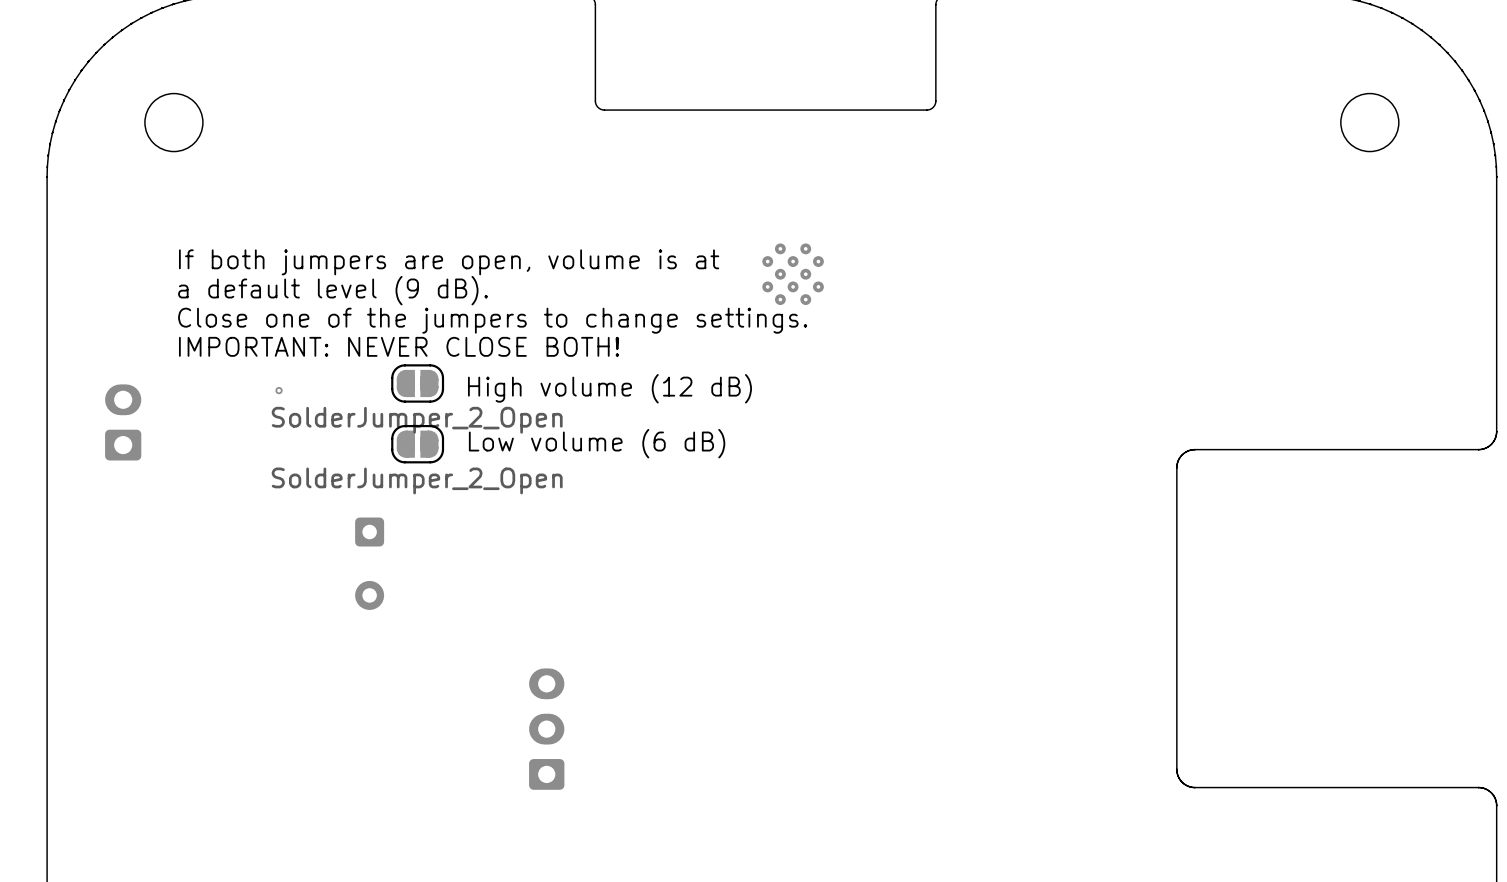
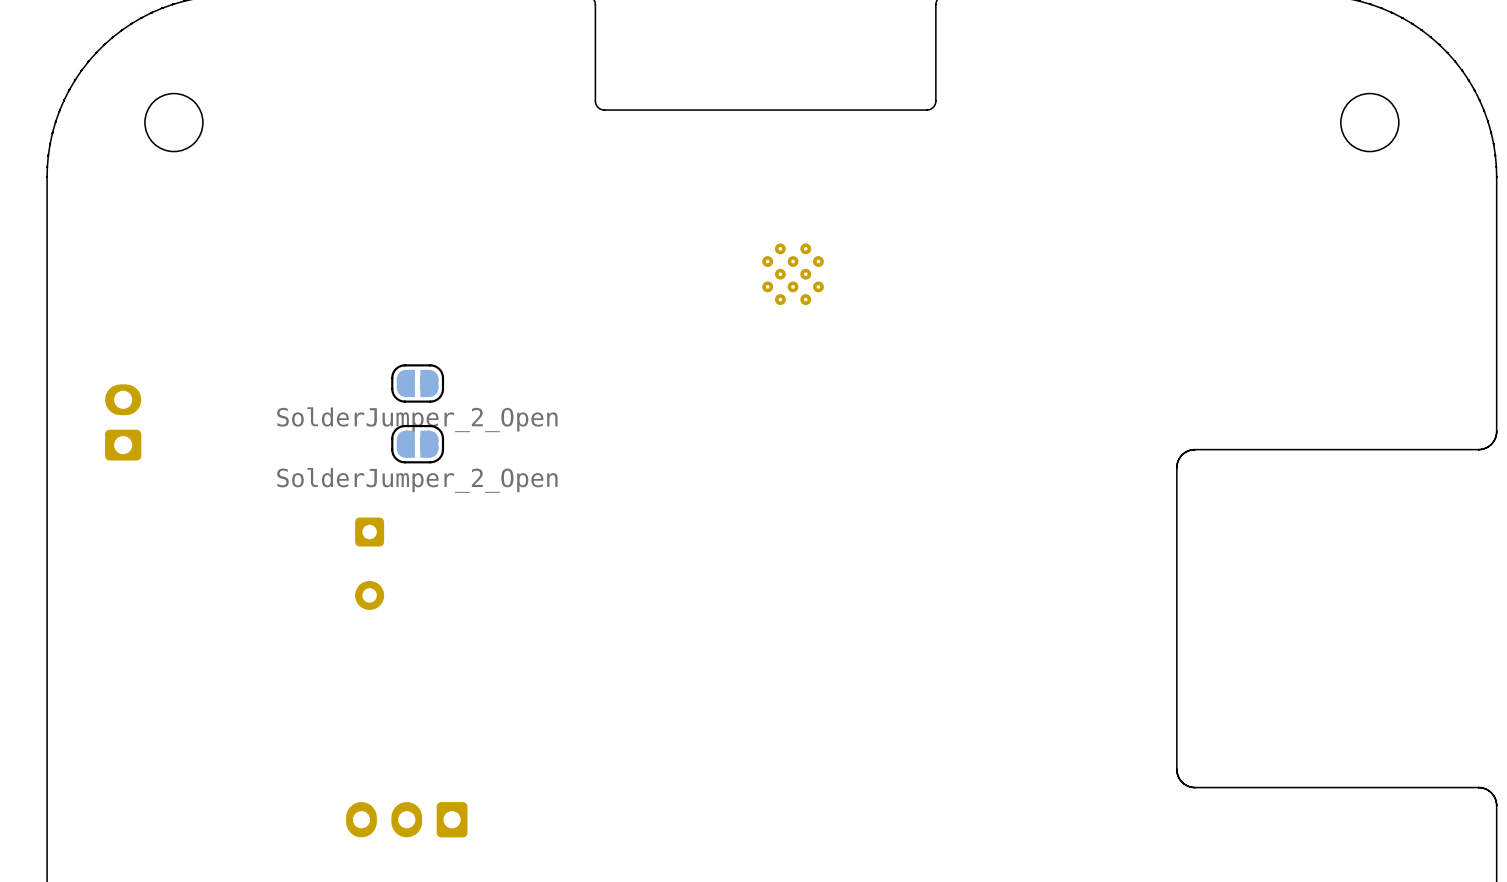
text: If both jumpers are open, volume is at (449, 262) -> none
text: a default level (9 dB). (333, 290) -> none
text: Close one of the jumpers to change settings. (492, 320) -> none
text: IMPORTANT: NEVER CLOSE BOTH! (399, 346) -> none
text: High volume (12 dB) (609, 388) -> none
part: (279, 390) -> none
text: Low volume (6 dB) (597, 443) -> none
part rotation: 0° (546, 729) -> 90° counterclockwise (406, 819)
part position: (546, 729) -> (406, 819)

